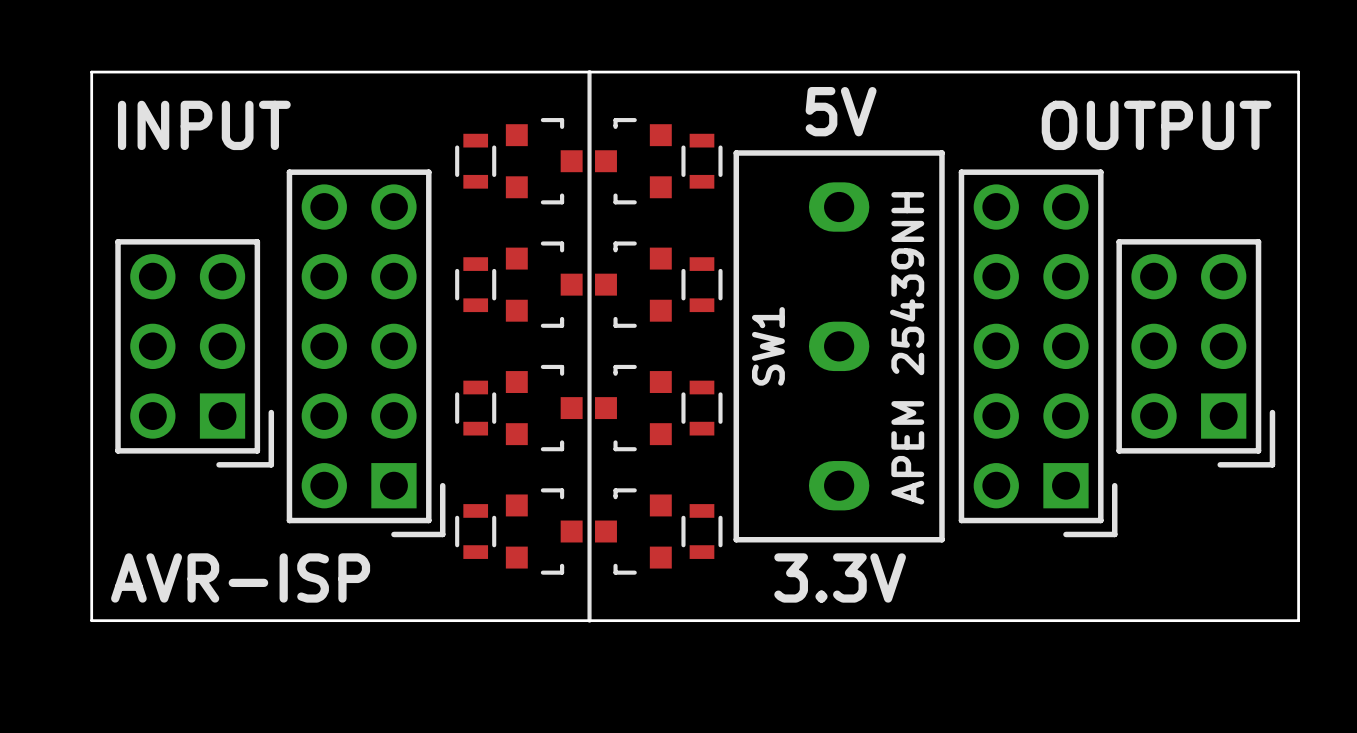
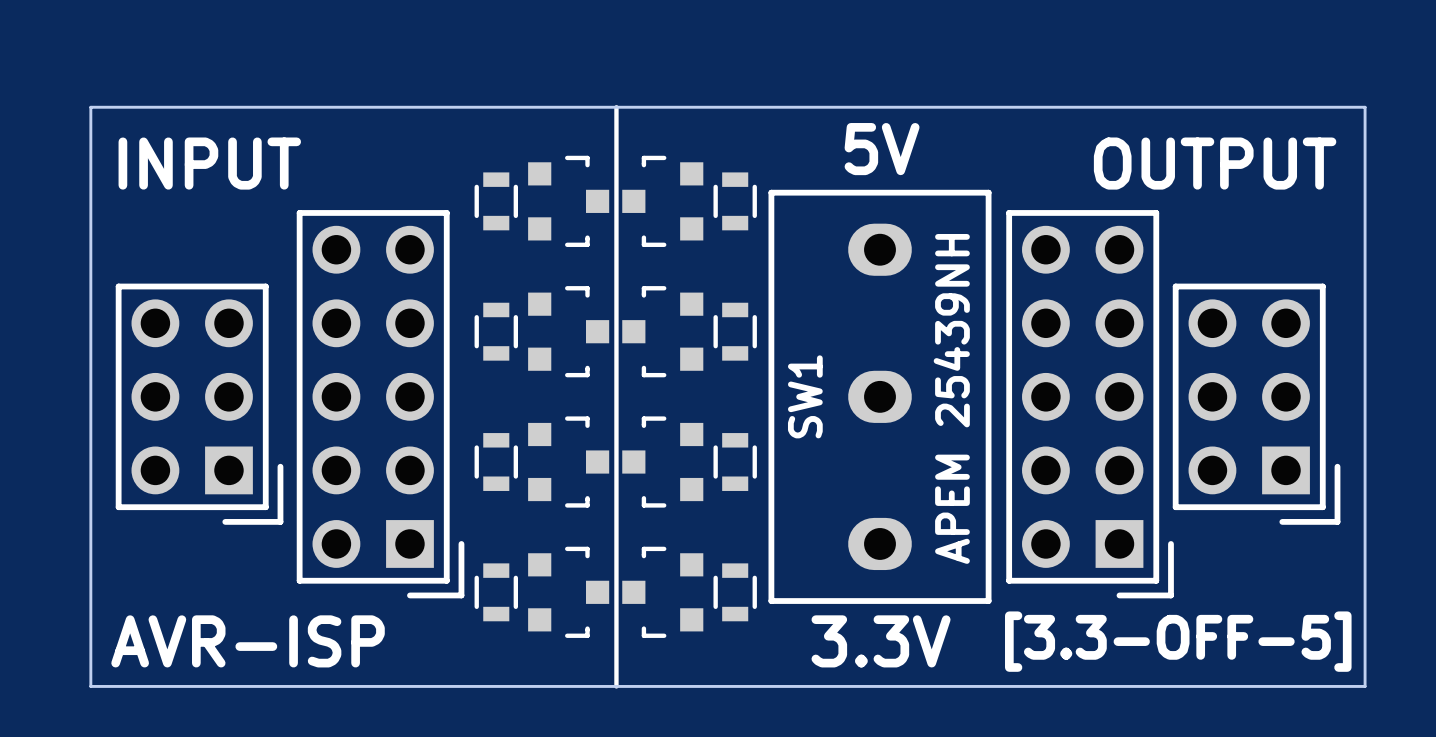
text: none -> [3.3-OFF-5] (1178, 641)

